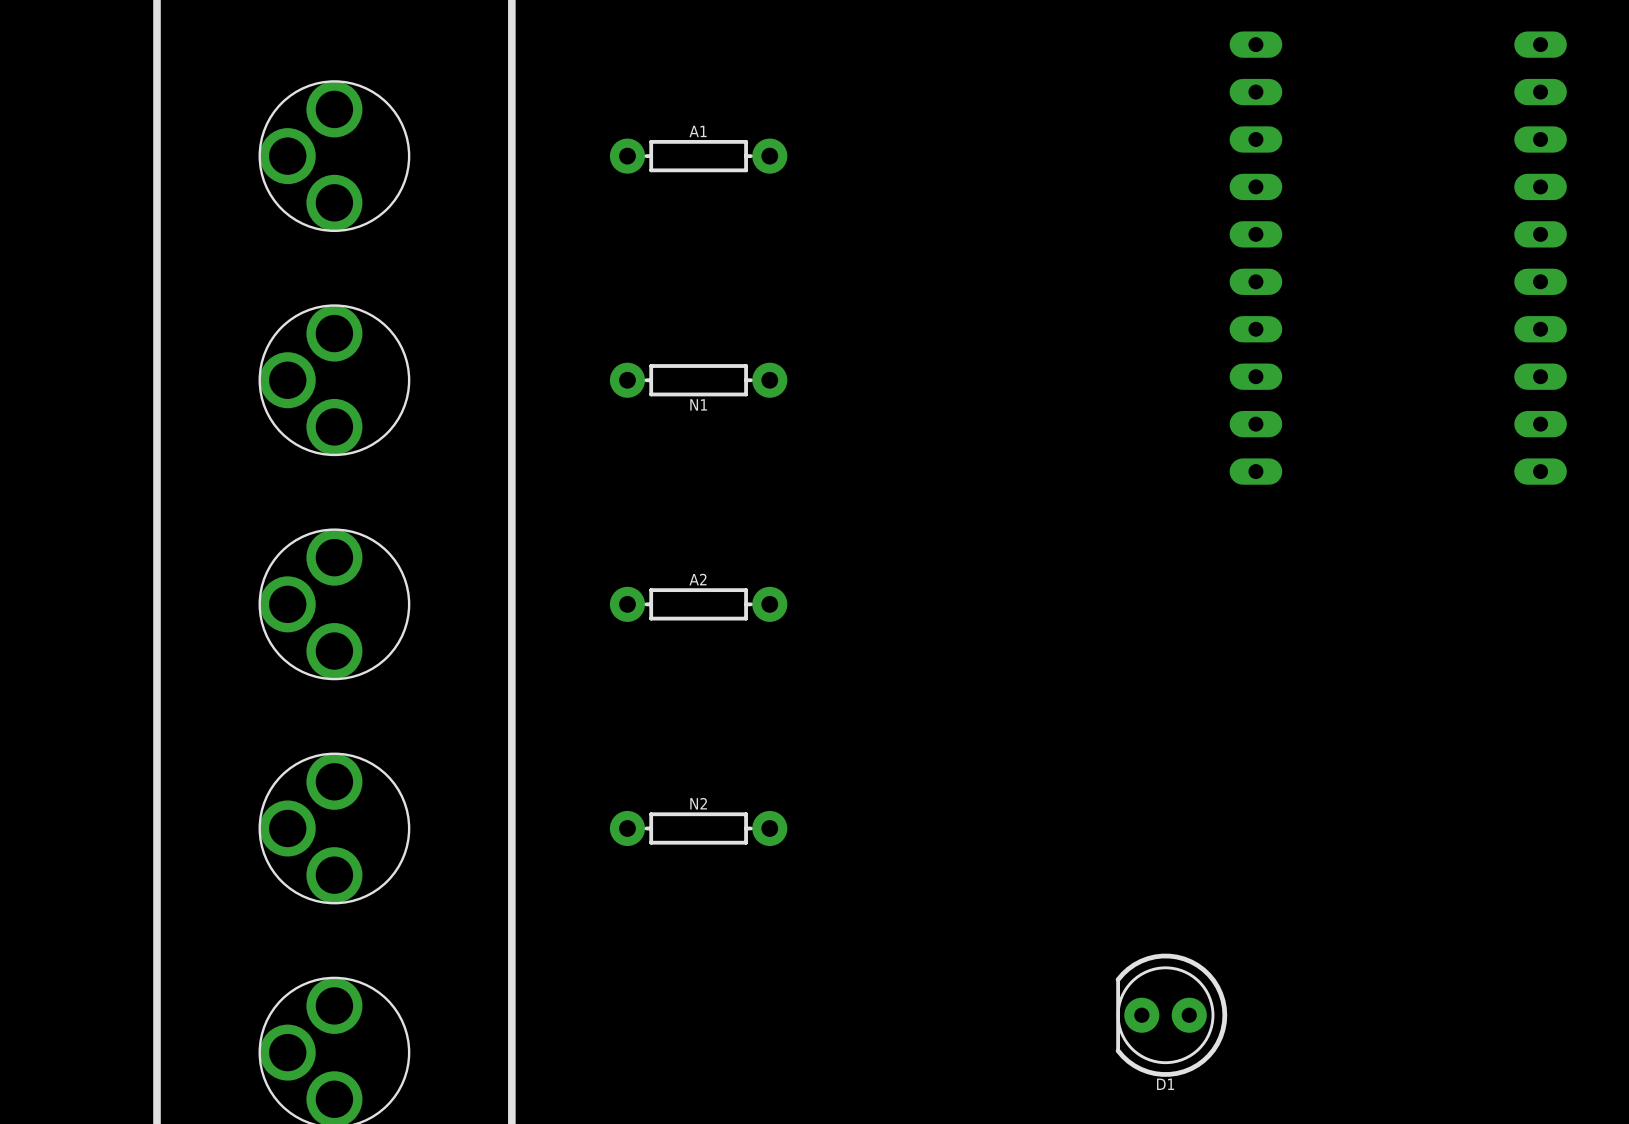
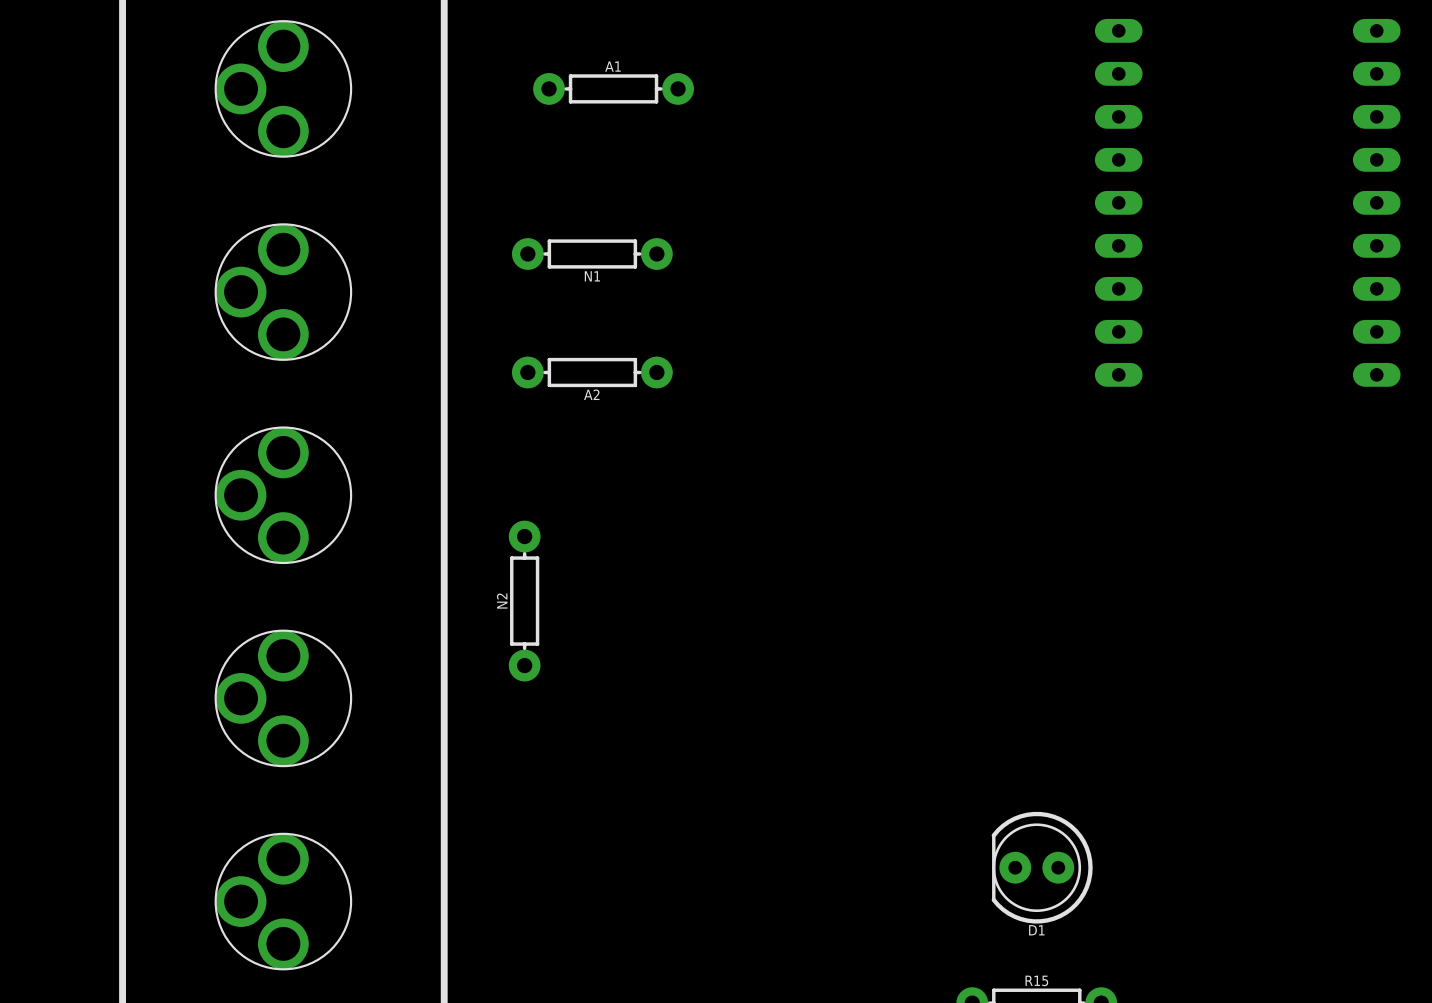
N1 position: (698, 380) -> (592, 253)
A2 name position: A2 (697, 579) -> A2 (591, 394)
A2 position: (698, 604) -> (592, 372)
N2 rotation: 0° (698, 828) -> 90° clockwise (524, 601)
N2 position: (698, 828) -> (524, 601)

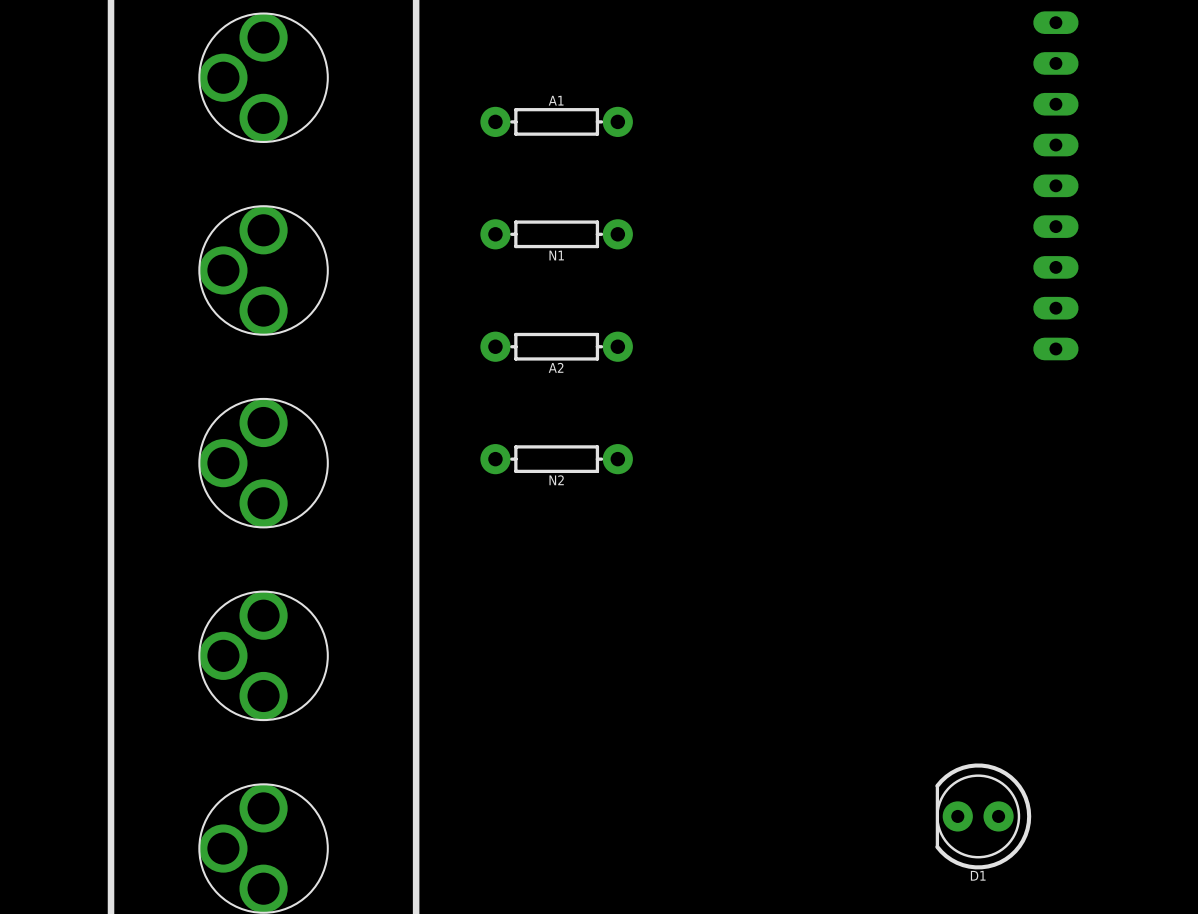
A1 position: (613, 88) -> (556, 121)
N2 rotation: 0° (524, 601) -> 90° clockwise (556, 459)
N2 position: (524, 601) -> (556, 459)

